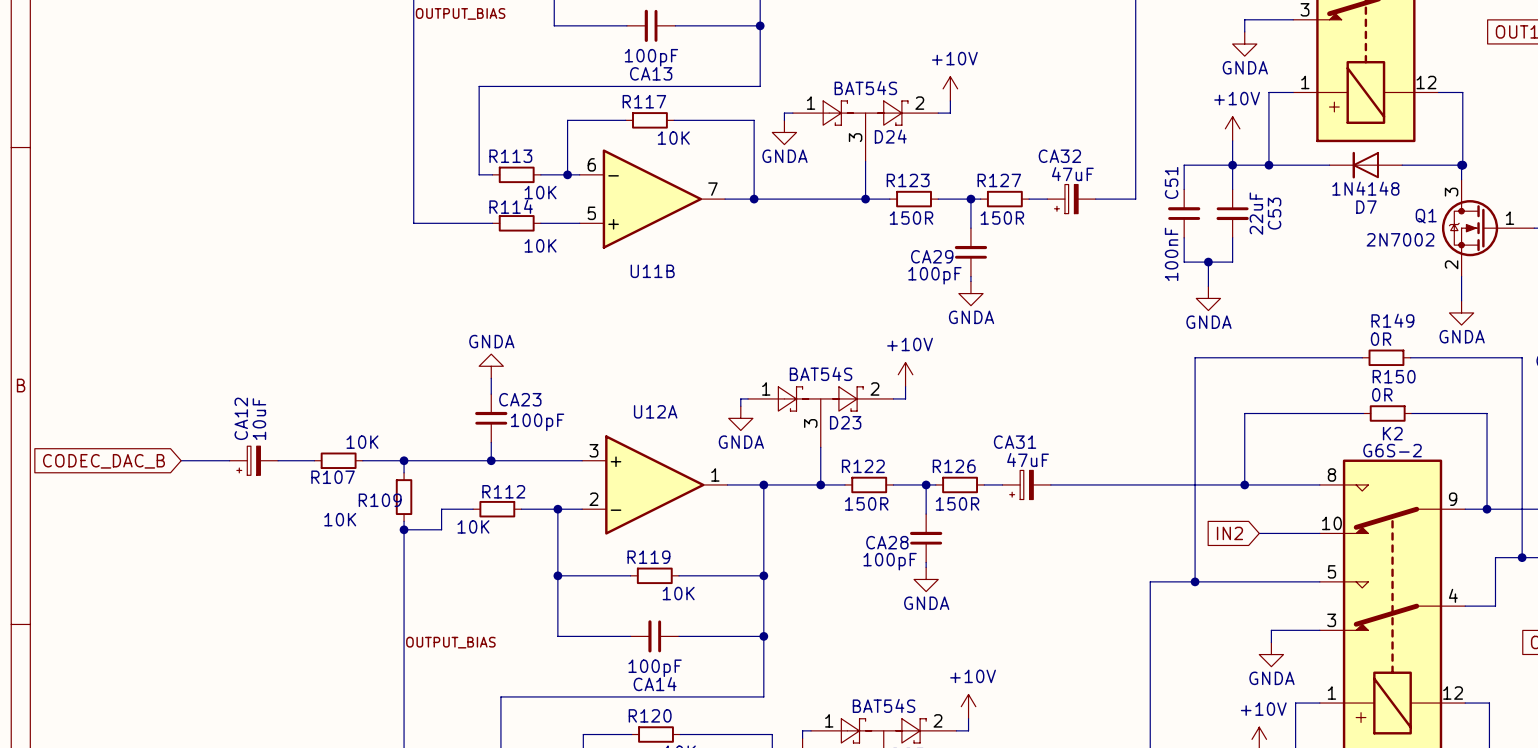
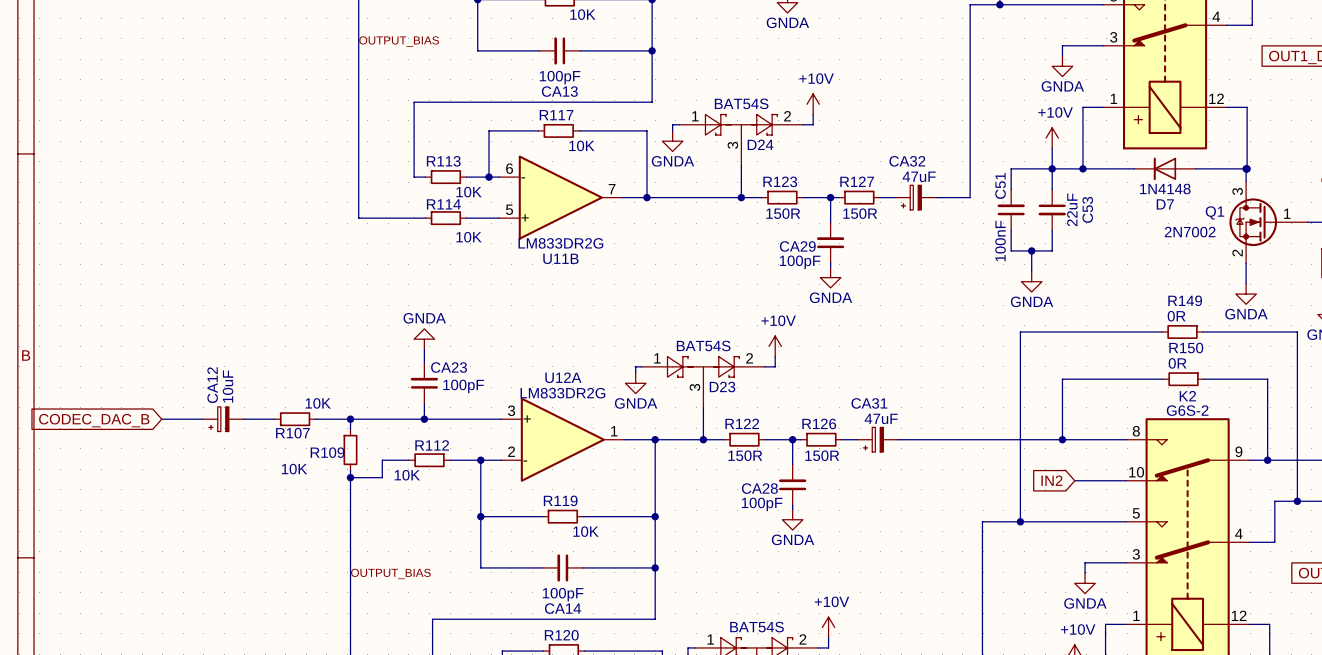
U11B value: none -> LM833DR2G (560, 243)
U12A value: none -> LM833DR2G (562, 393)

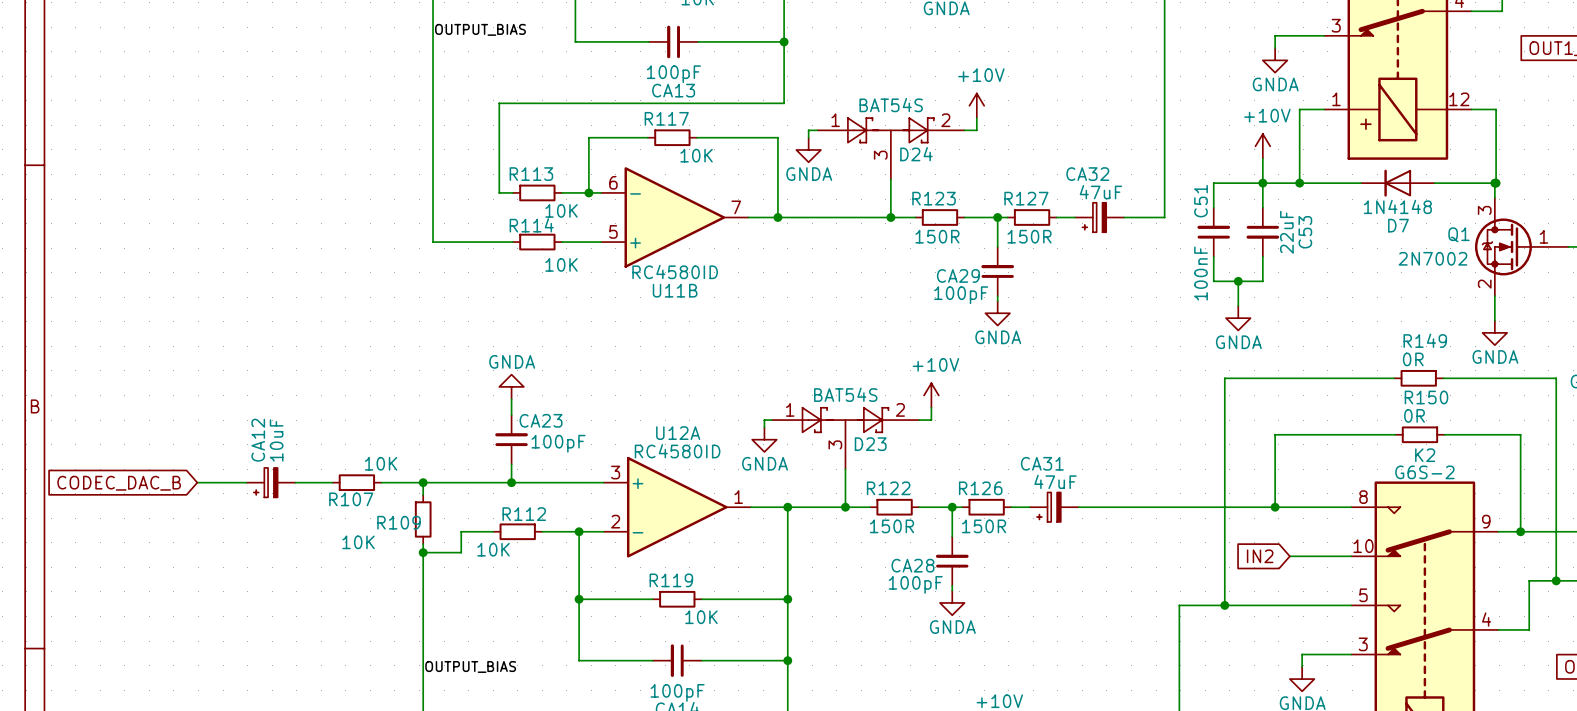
U11B value: LM833DR2G (560, 243) -> RC4580ID (675, 271)
U12A value: LM833DR2G (562, 393) -> RC4580ID (677, 451)

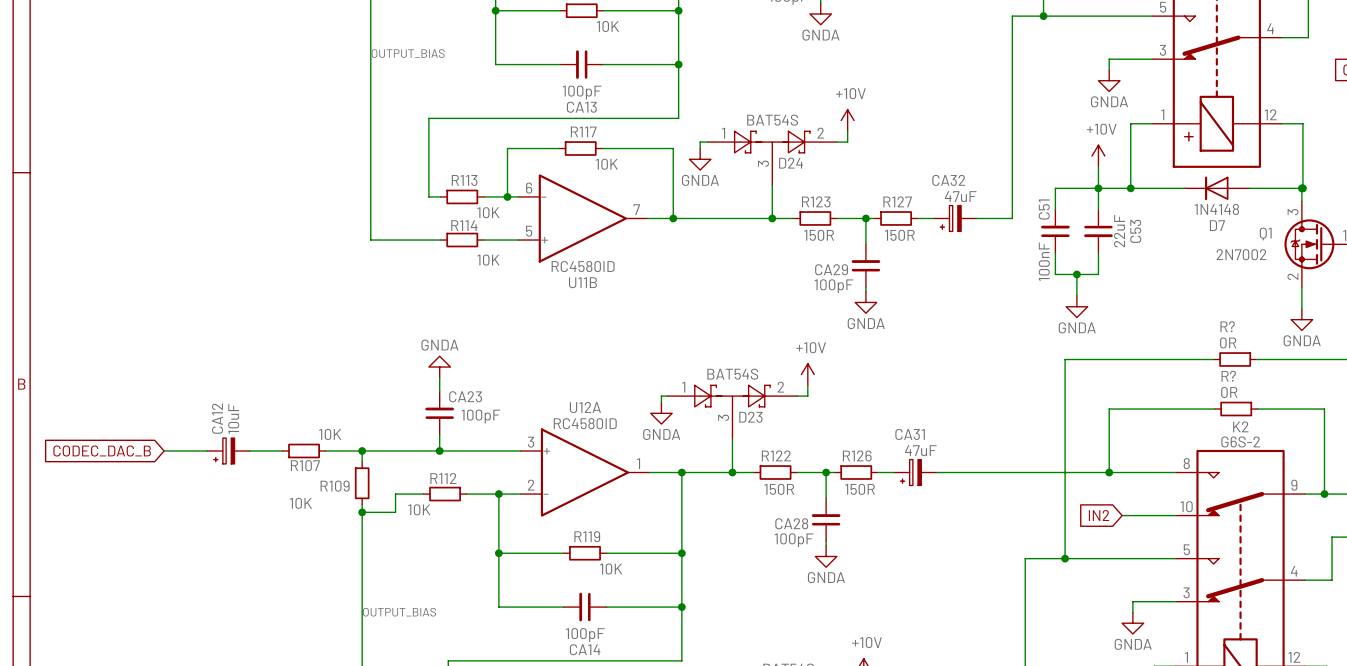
R149 name: R149 (1425, 340) -> R? (1227, 326)
R150 name: R150 (1426, 397) -> R? (1228, 376)

